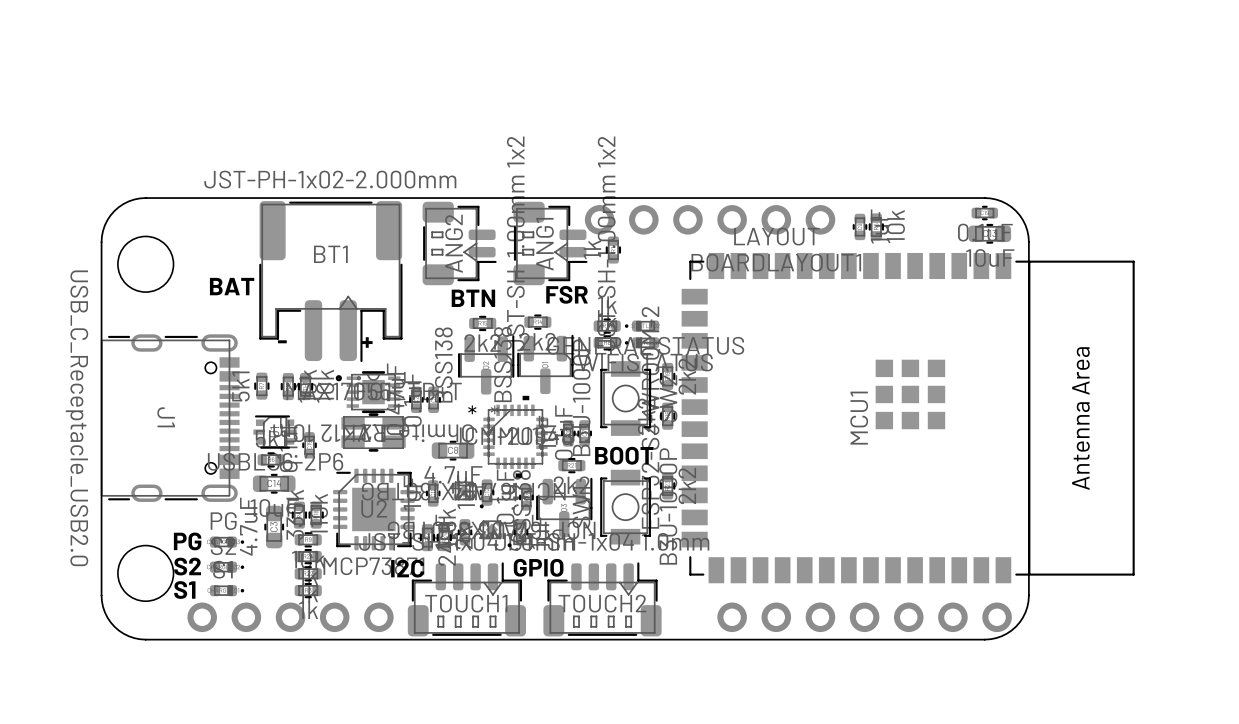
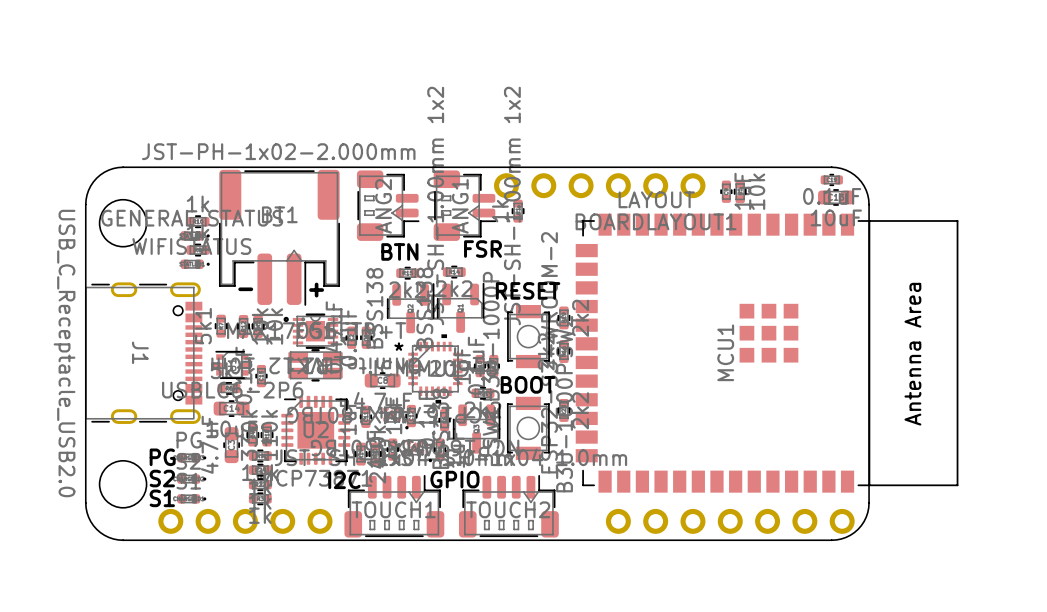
text: BAT (232, 286) -> none
part position: (607, 326) -> (198, 221)
part rotation: 0° (642, 326) -> 180° (195, 235)
part position: (642, 326) -> (195, 235)
part position: (607, 342) -> (198, 250)
part rotation: 0° (642, 342) -> 180° (195, 264)
part position: (642, 342) -> (195, 264)
text: none -> RESET (528, 290)

